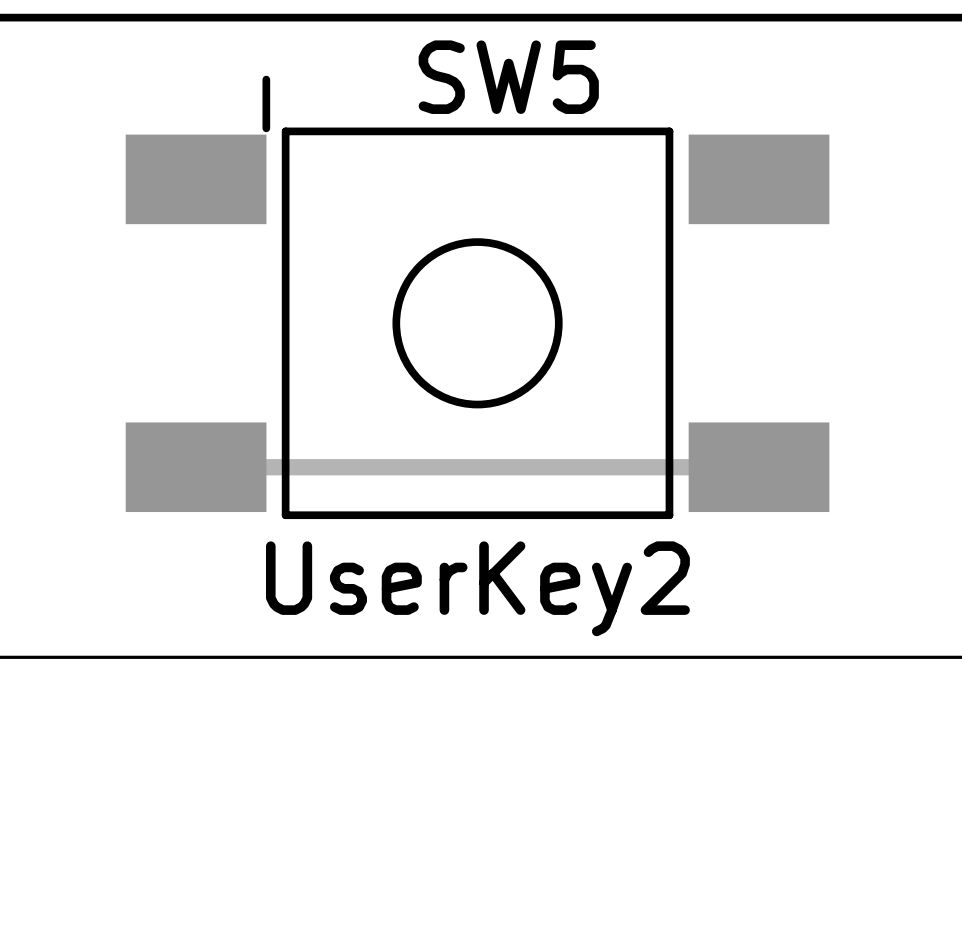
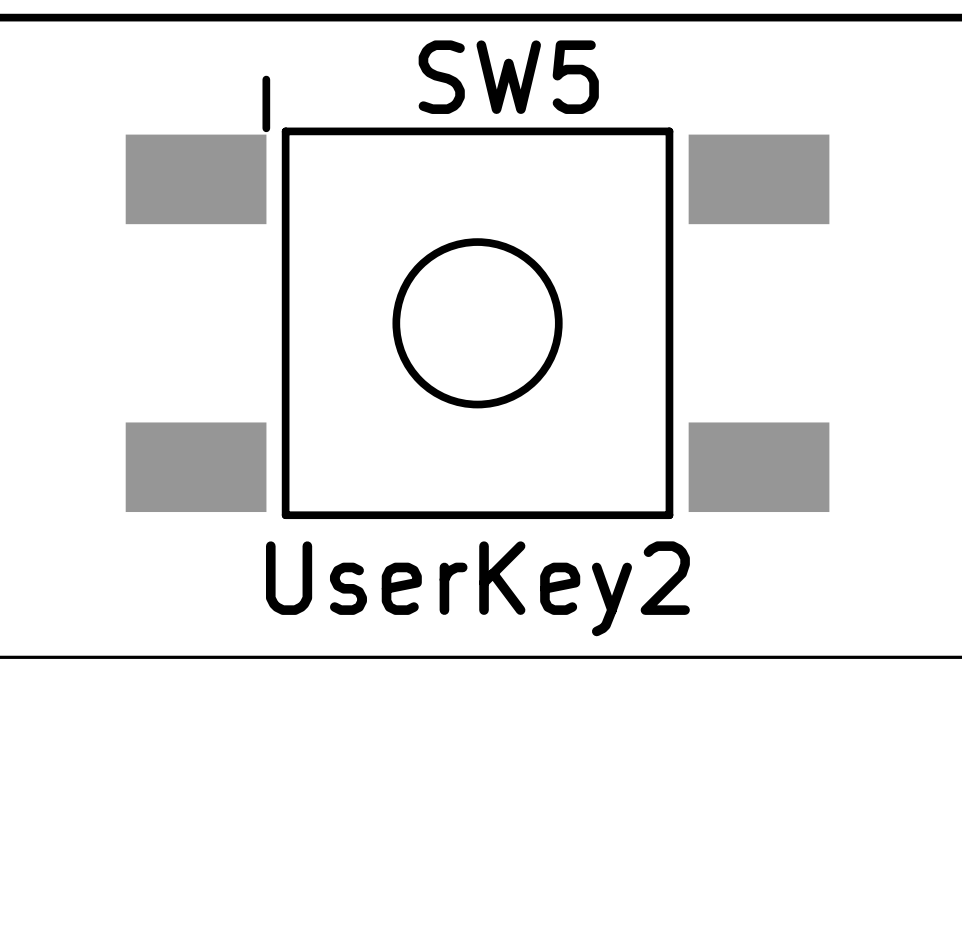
track: (196, 467) (759, 467) -> none

